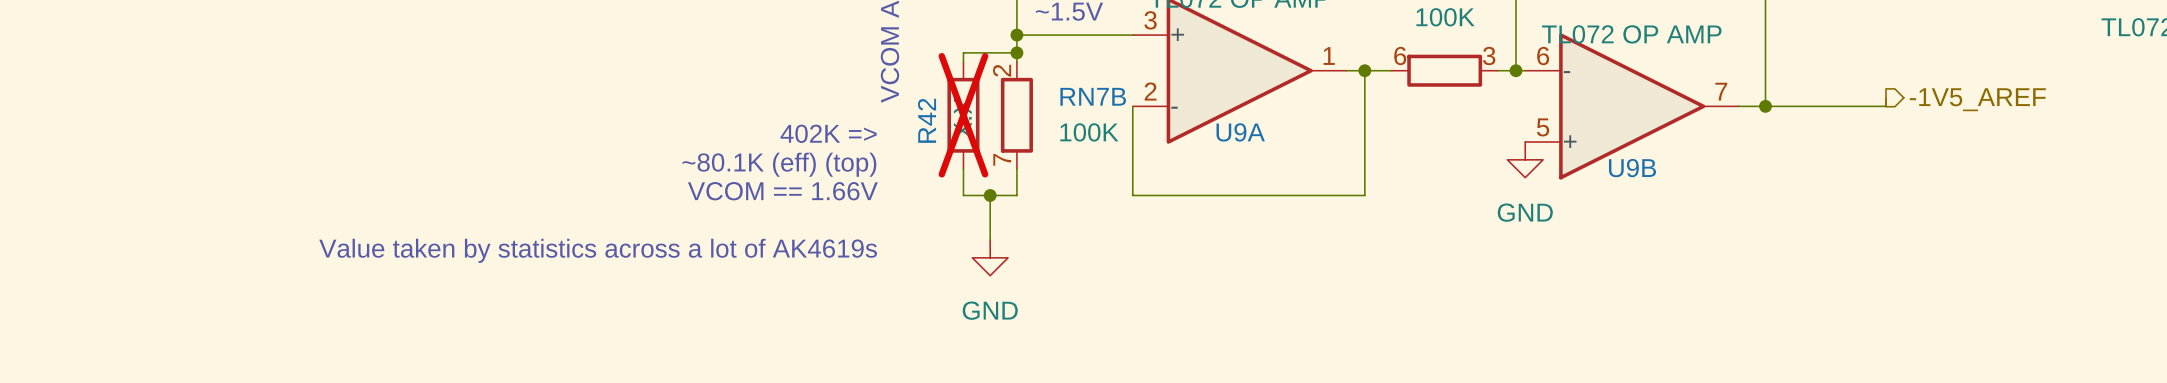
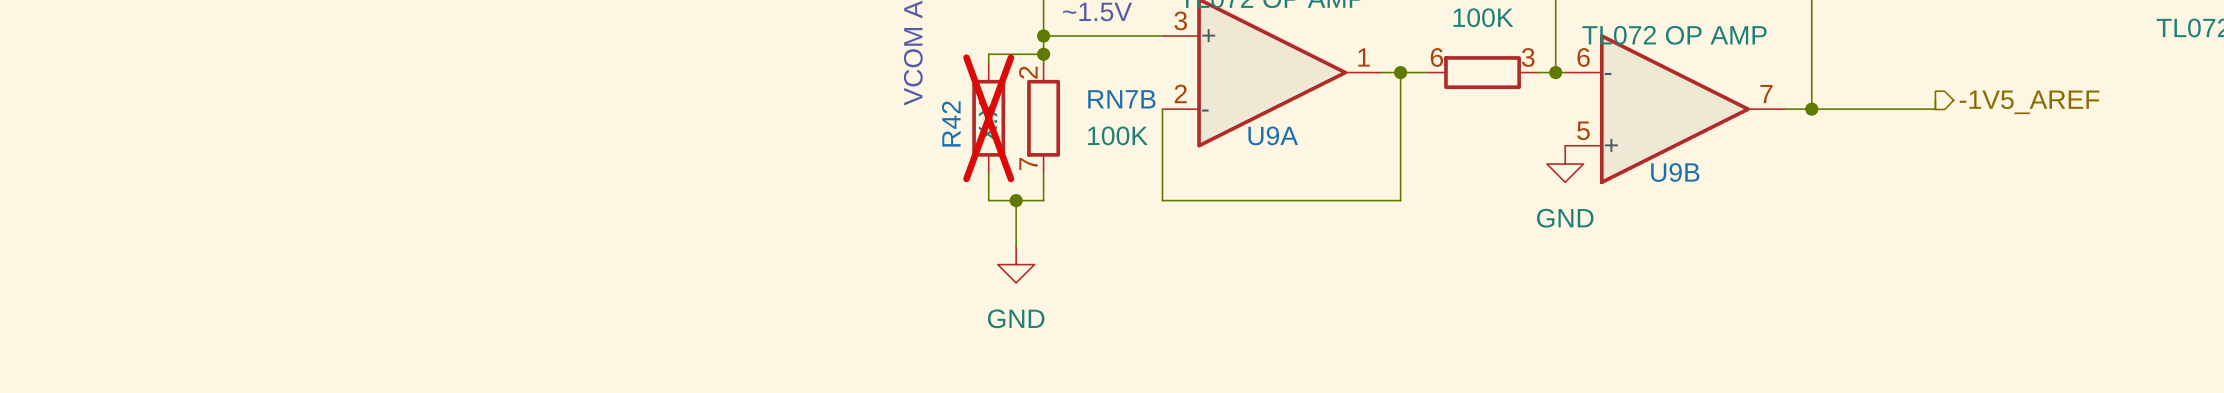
text: 402K => (828, 133) -> none
text: ~80.1K (eff) (top) (779, 164) -> none
text: VCOM == 1.66V (782, 191) -> none
text: Value taken by statistics across a lot of AK4619s (598, 250) -> none

